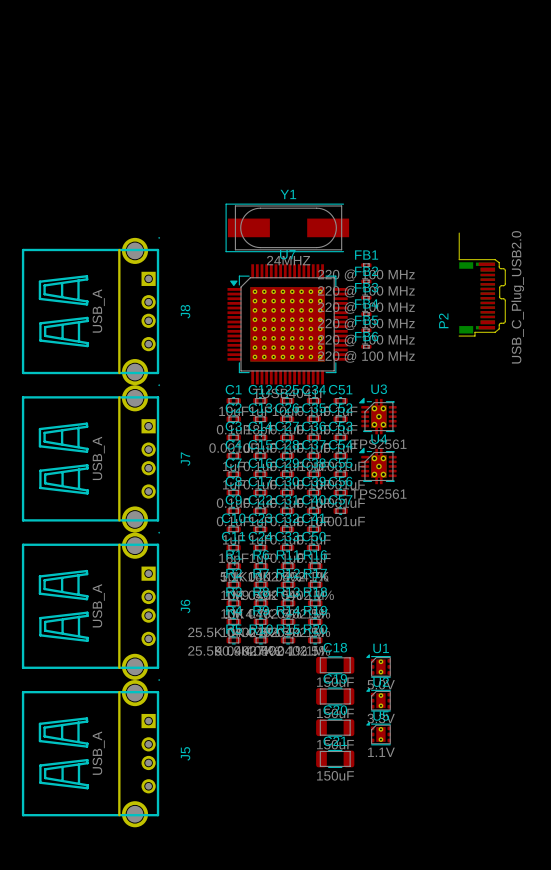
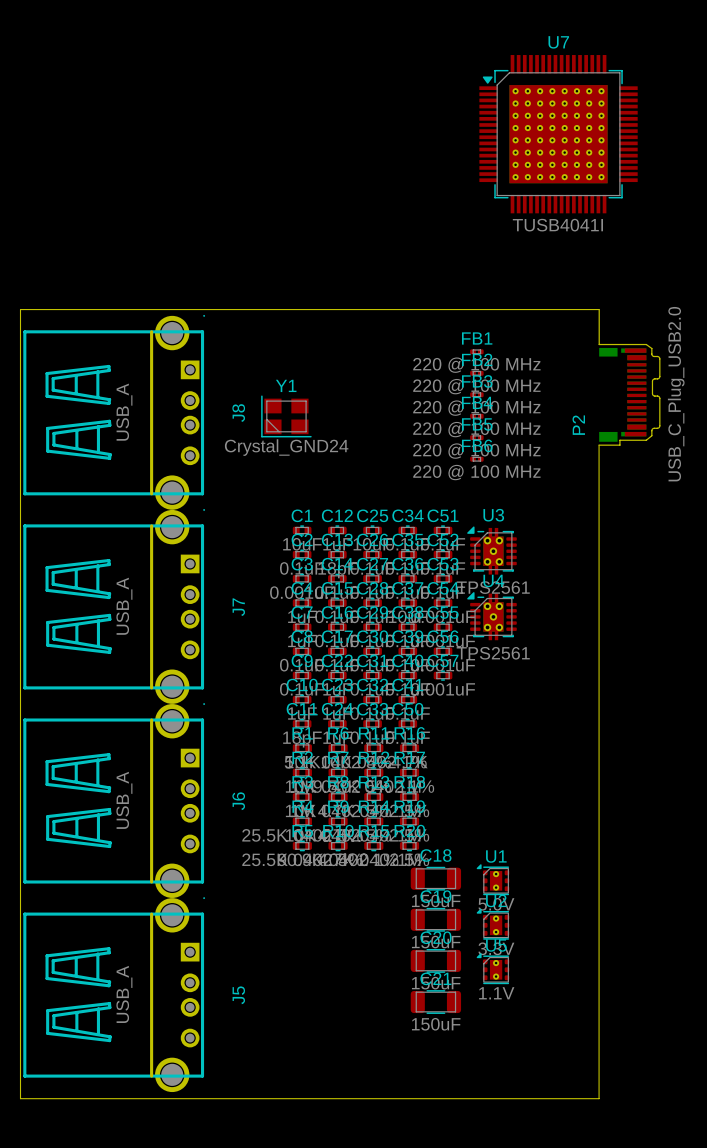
Y1 footprint: [225, 203, 350, 253] -> [261, 395, 312, 438]
board edge: none -> (599, 309) (20, 309) (20, 1098) (599, 1098) (599, 445)
Y1 value: 24MHZ (288, 260) -> Crystal_GND24 (286, 447)
U7 position: (287, 324) -> (558, 134)

